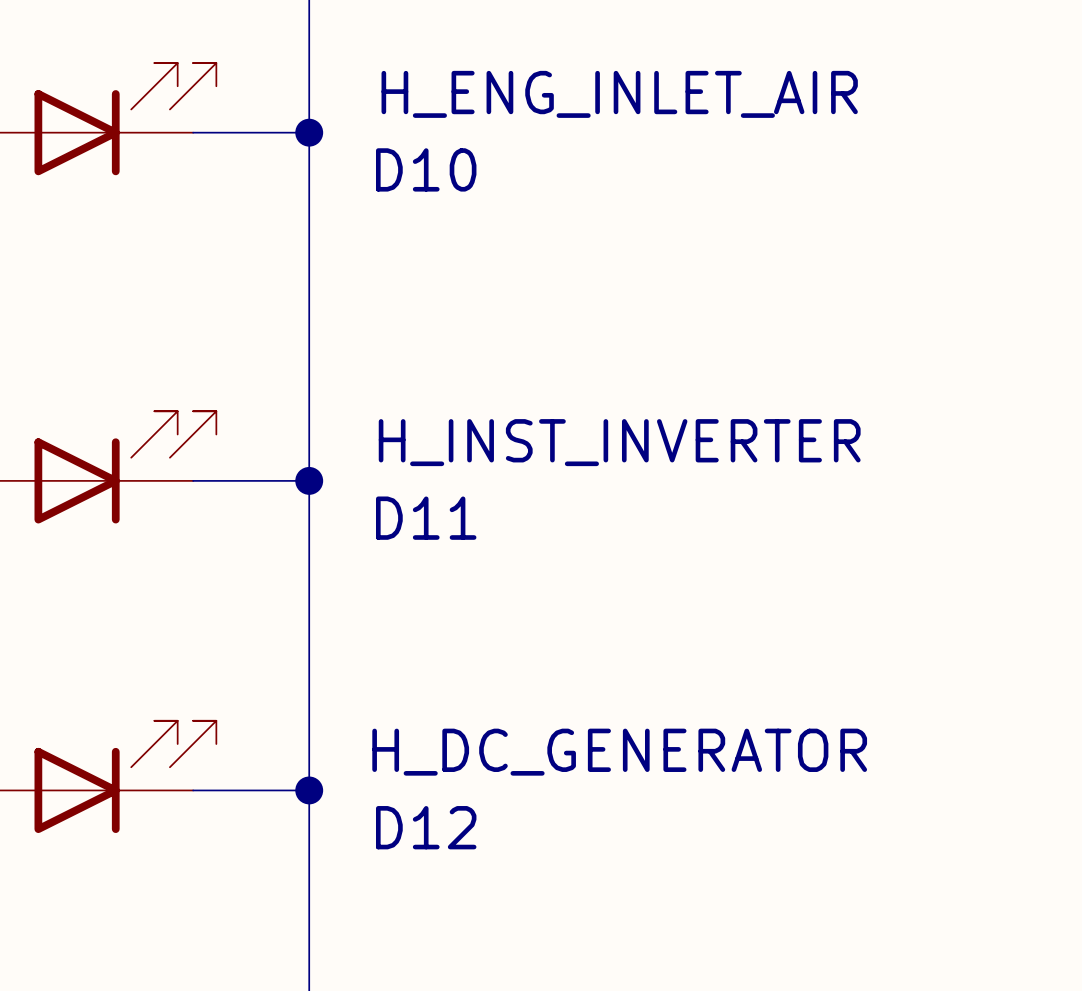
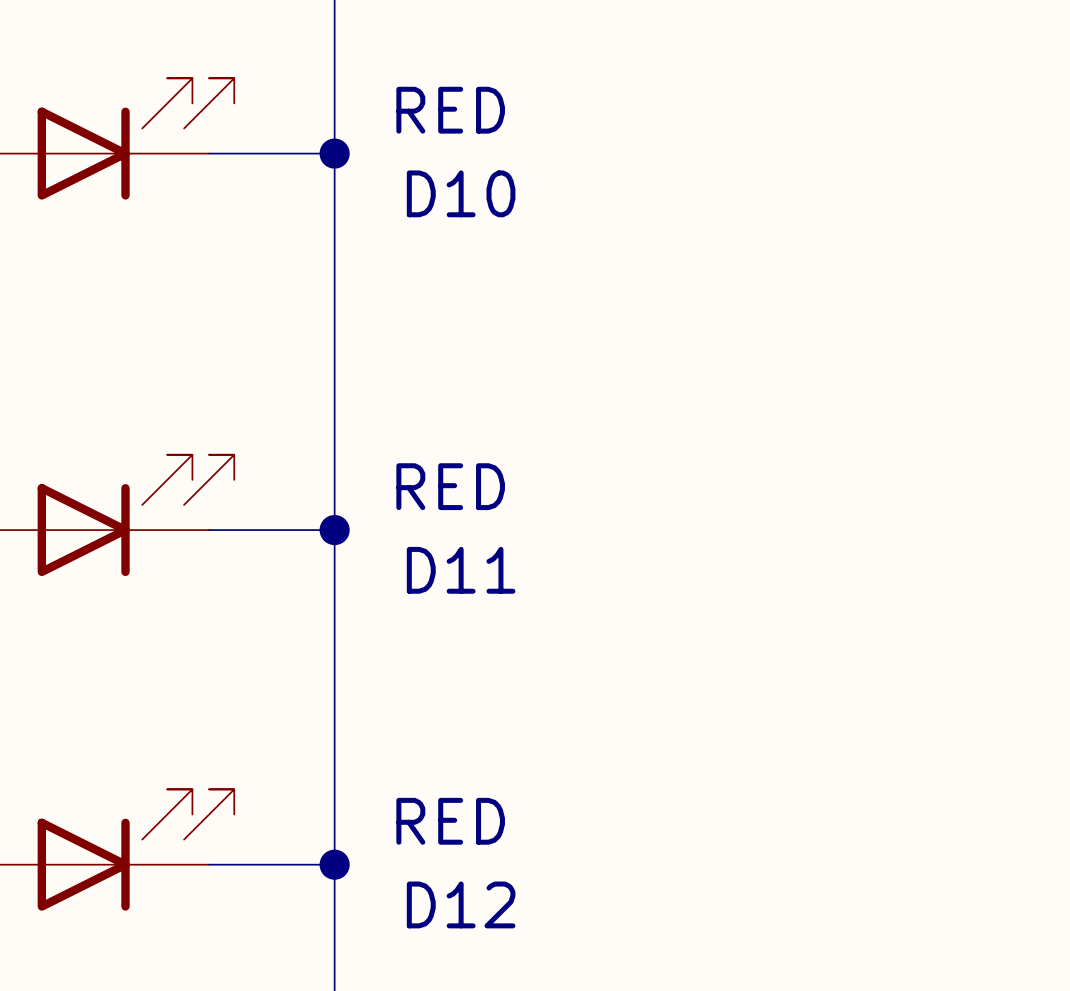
D10 value: H_ENG_INLET_AIR (619, 94) -> RED (450, 110)
D11 value: H_INST_INVERTER (619, 442) -> RED (450, 486)
D12 value: H_DC_GENERATOR (619, 752) -> RED (450, 821)

